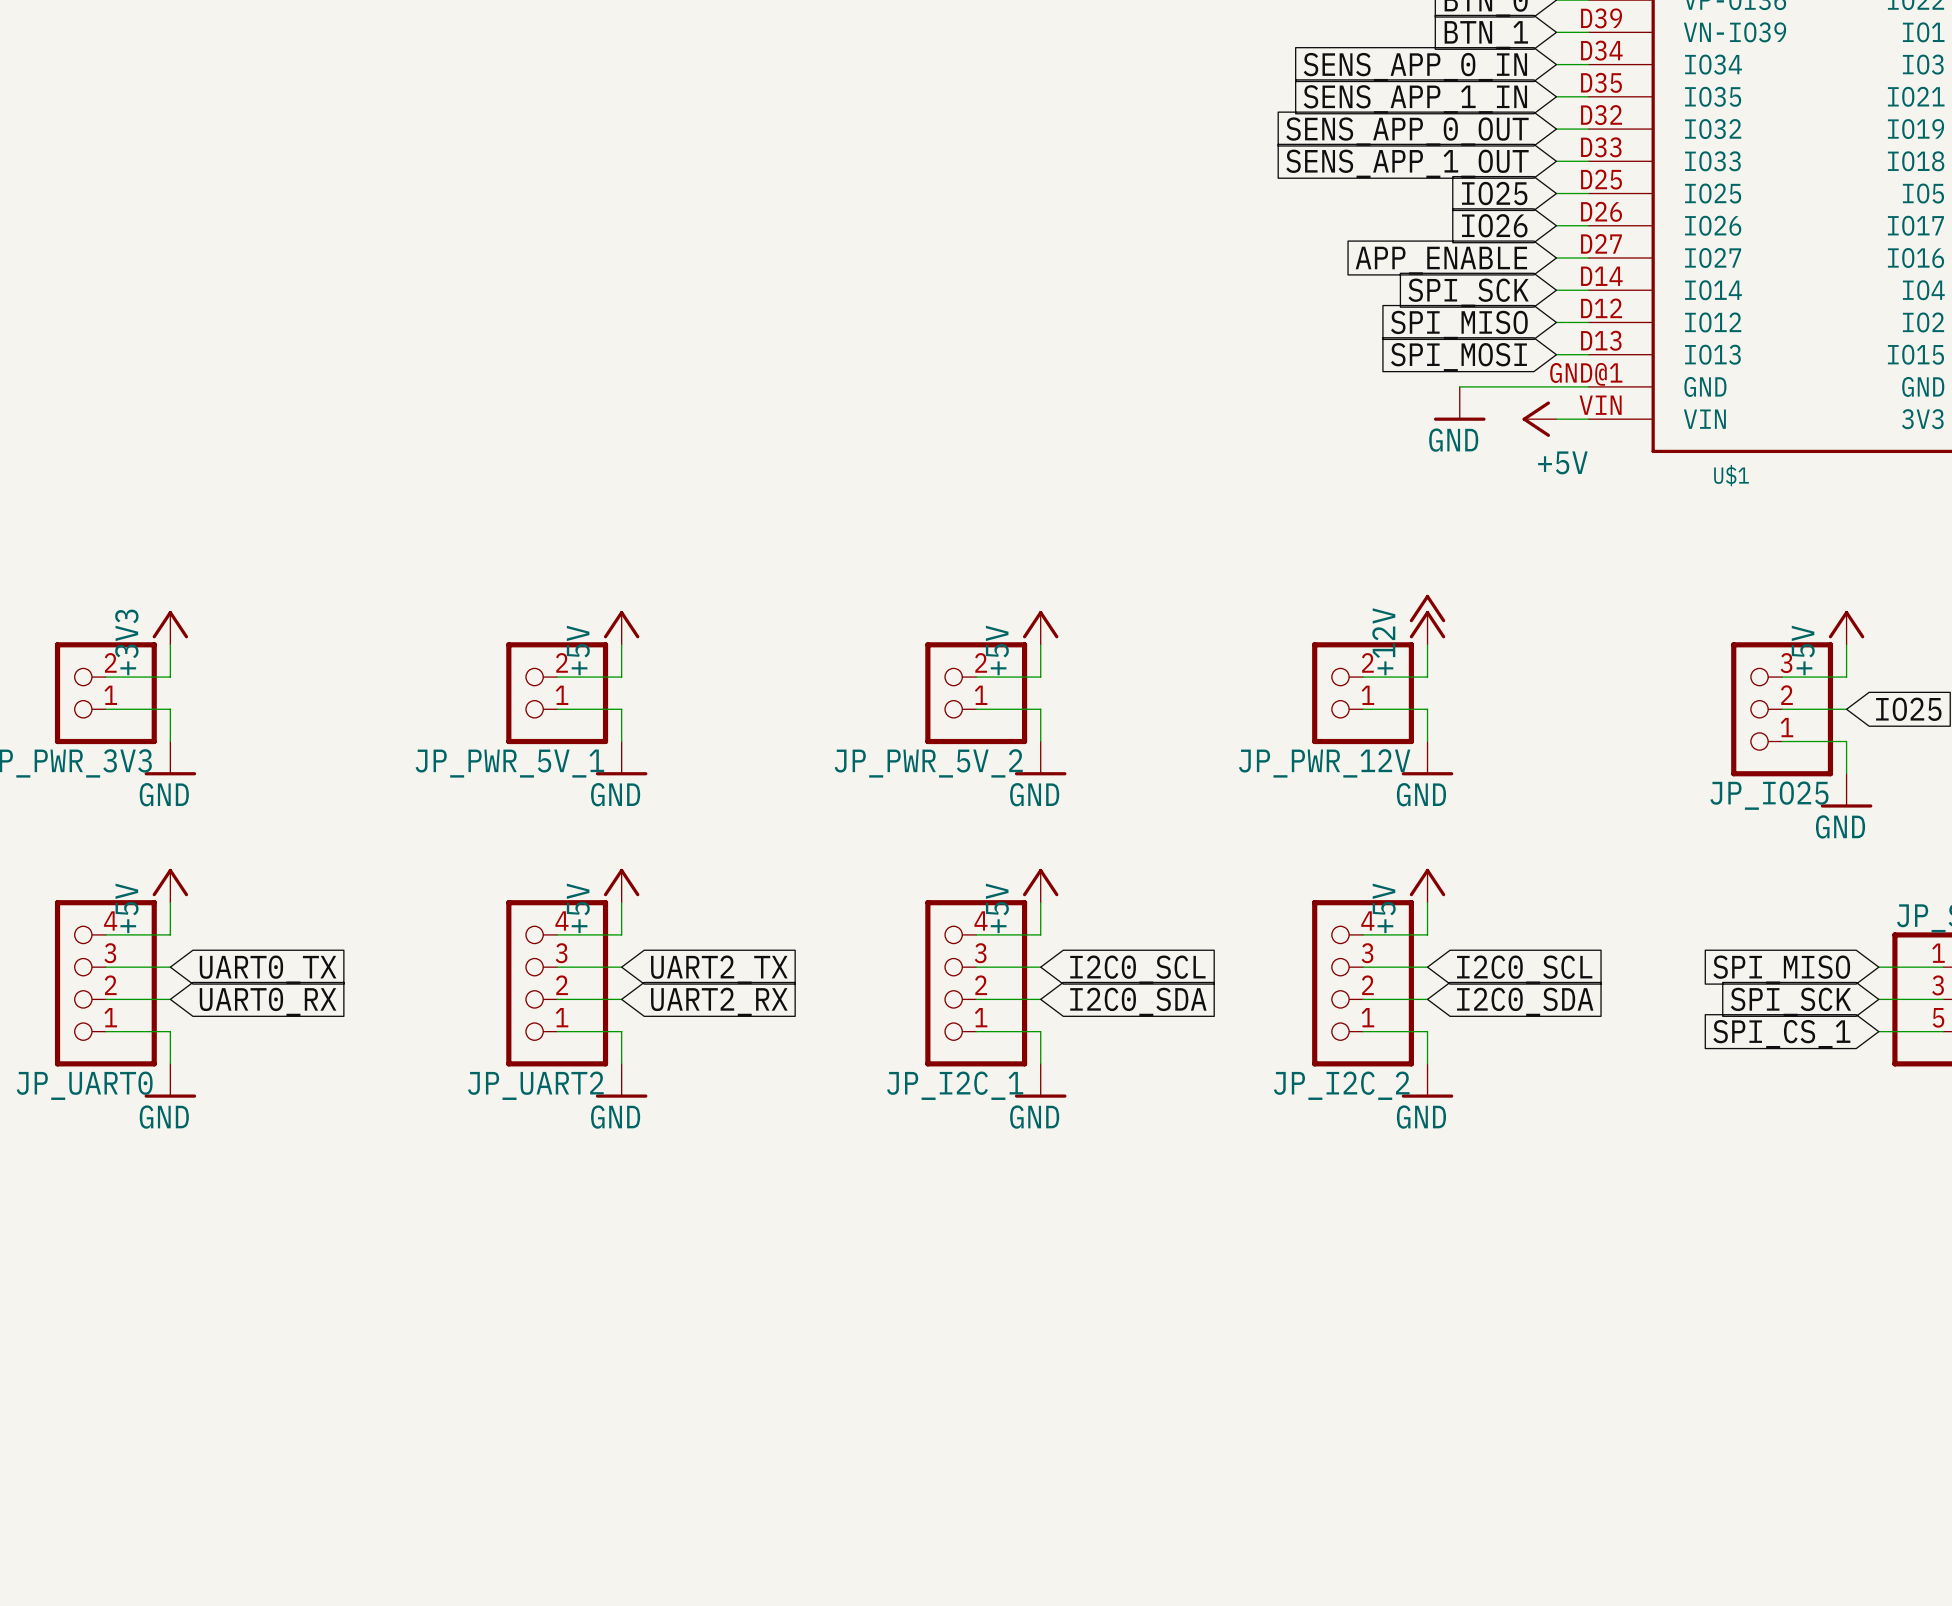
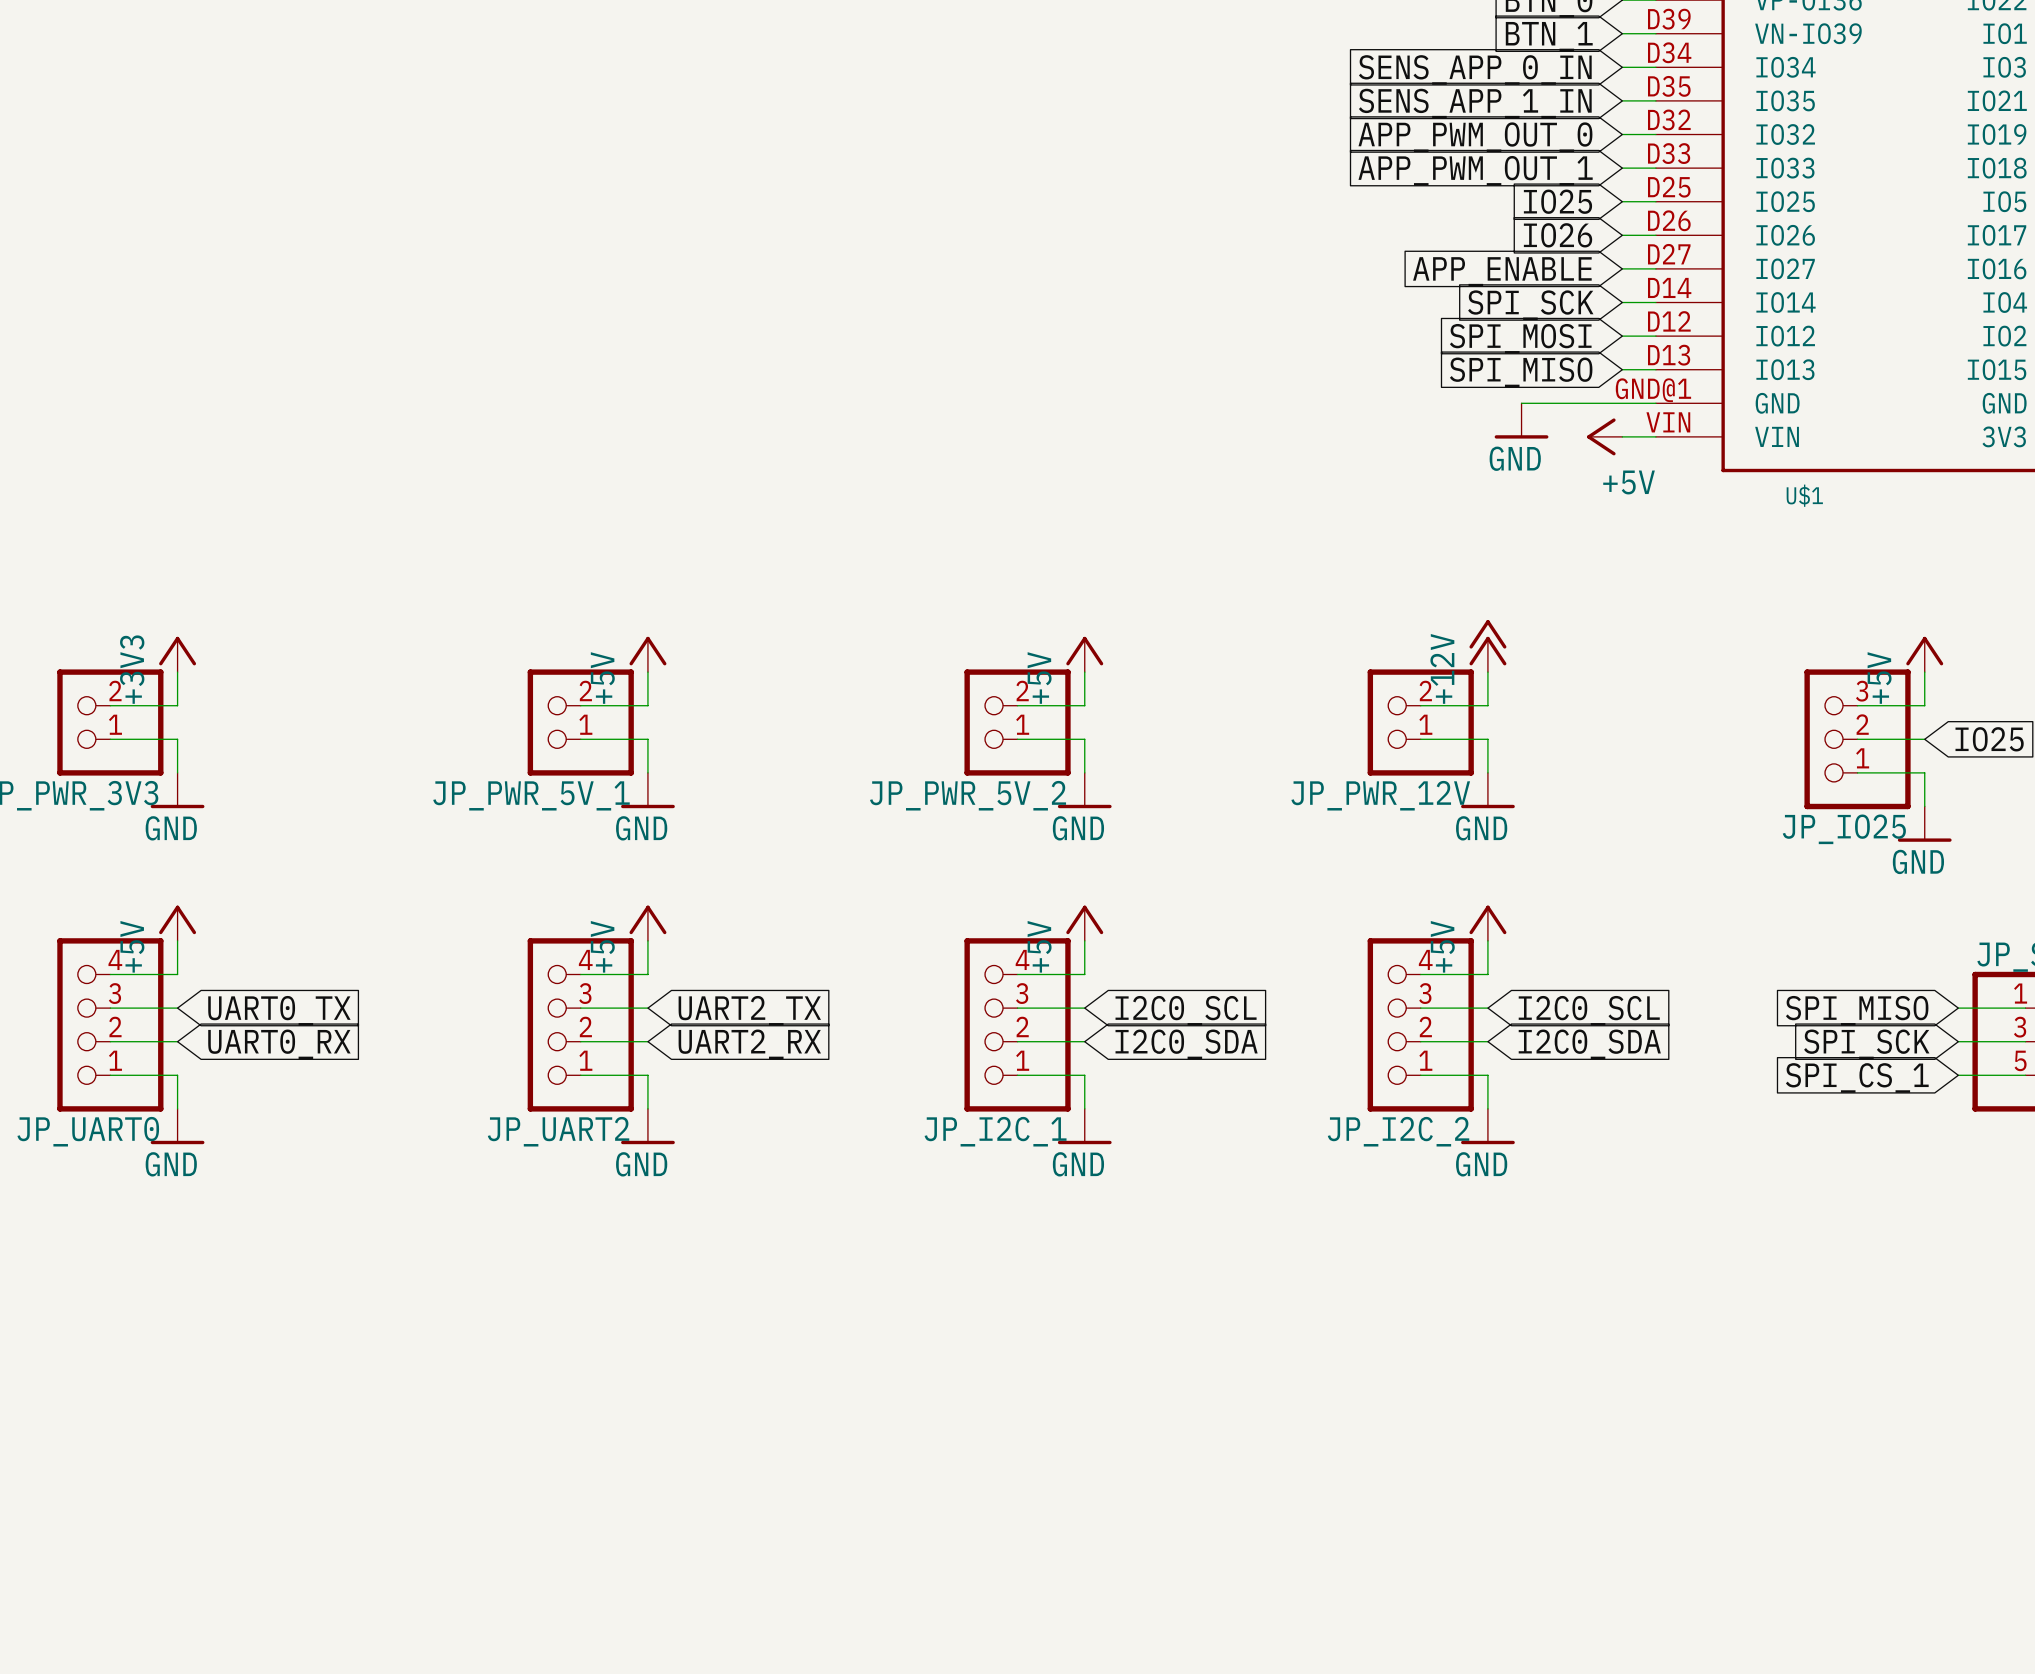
global label: SENS_APP_0_OUT (1407, 131) -> APP_PWM_OUT_0 (1475, 137)
global label: SENS_APP_1_OUT (1407, 163) -> APP_PWM_OUT_1 (1475, 170)
global label: SPI_MISO (1459, 325) -> SPI_MOSI (1520, 338)
global label: SPI_MOSI (1458, 357) -> SPI_MISO (1521, 372)

